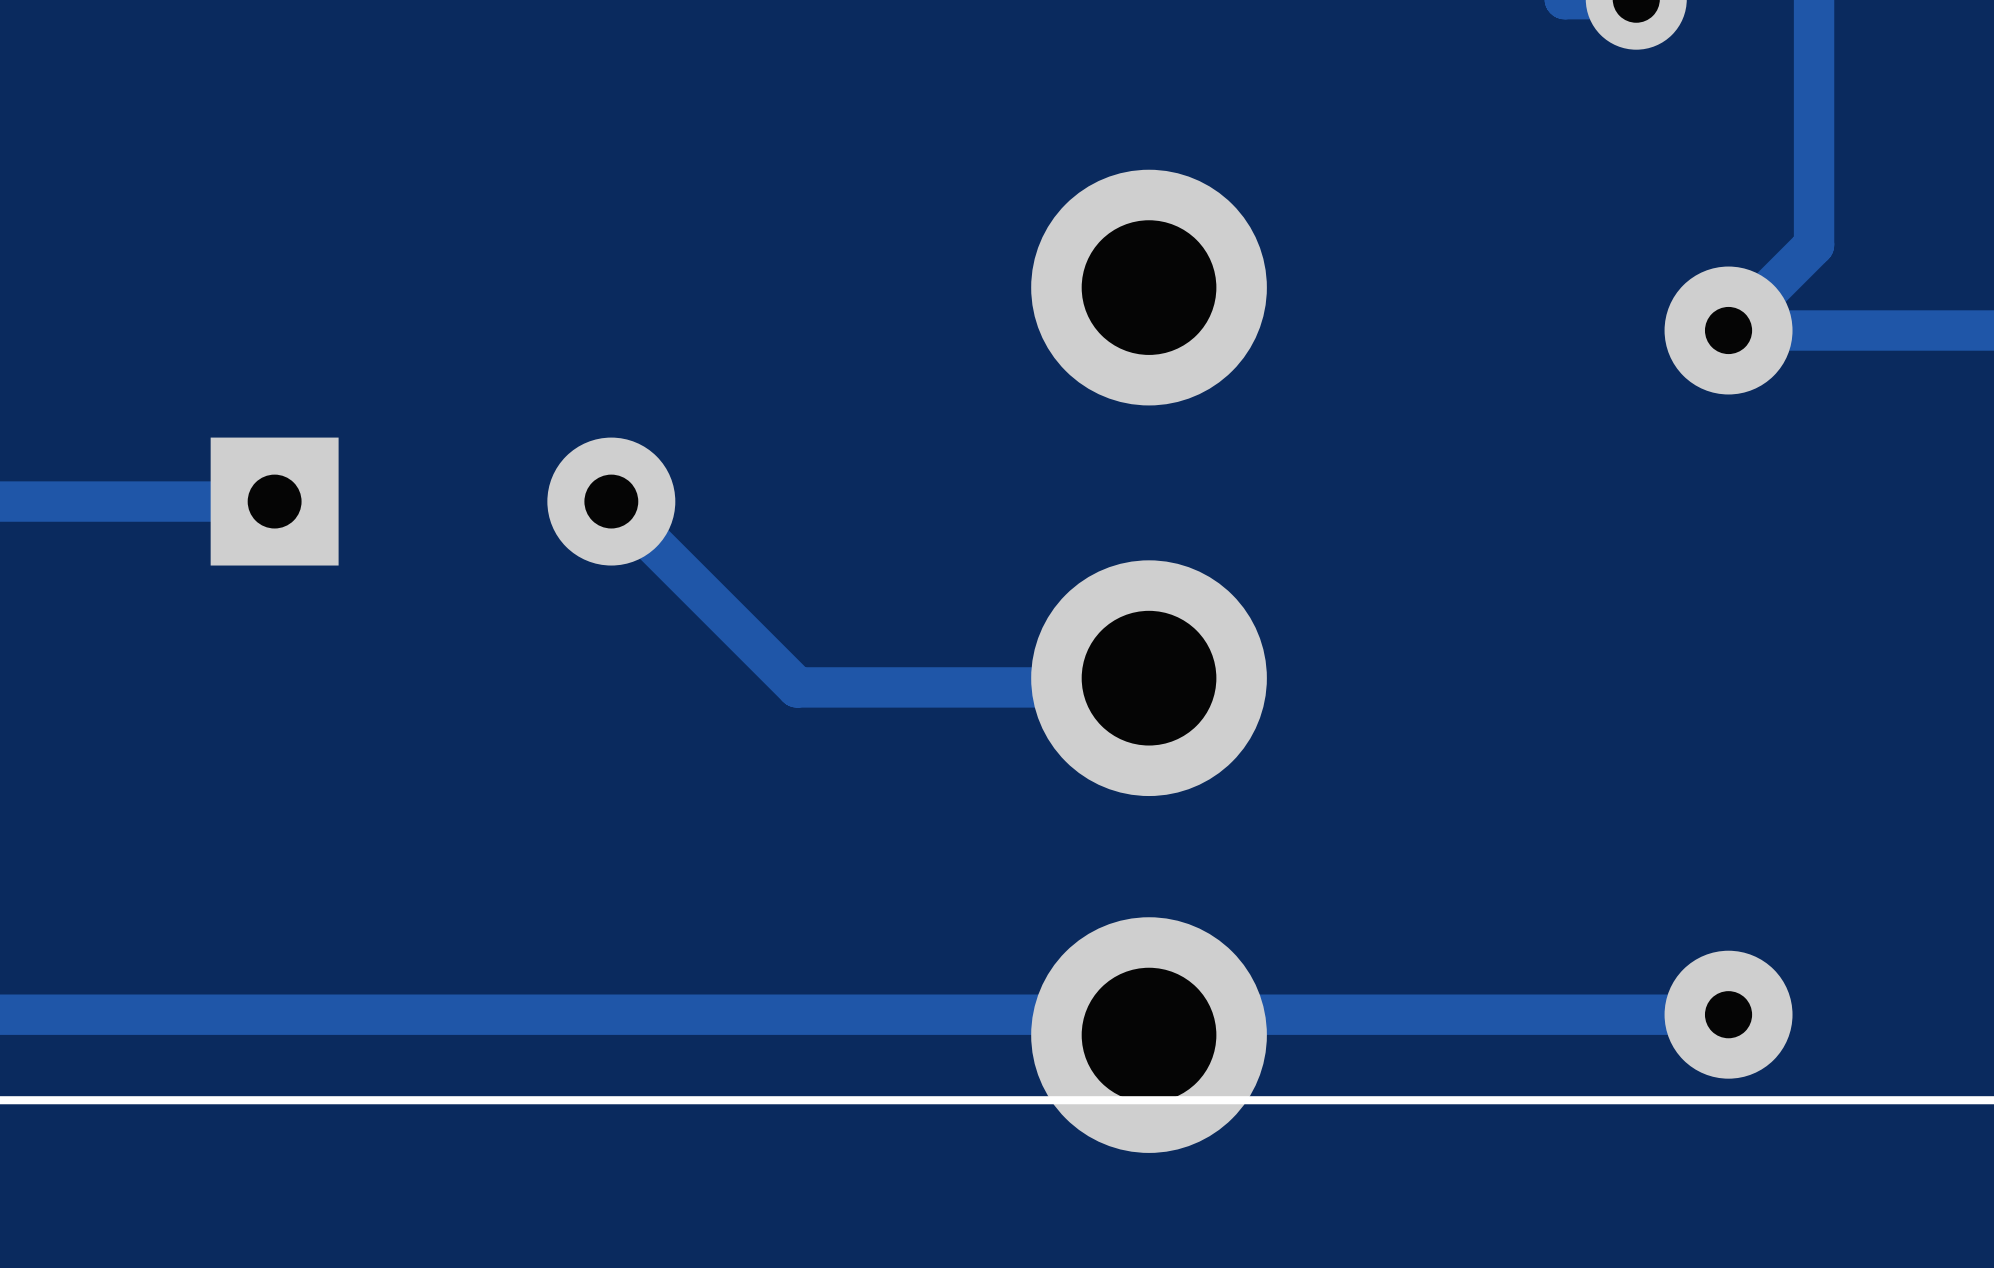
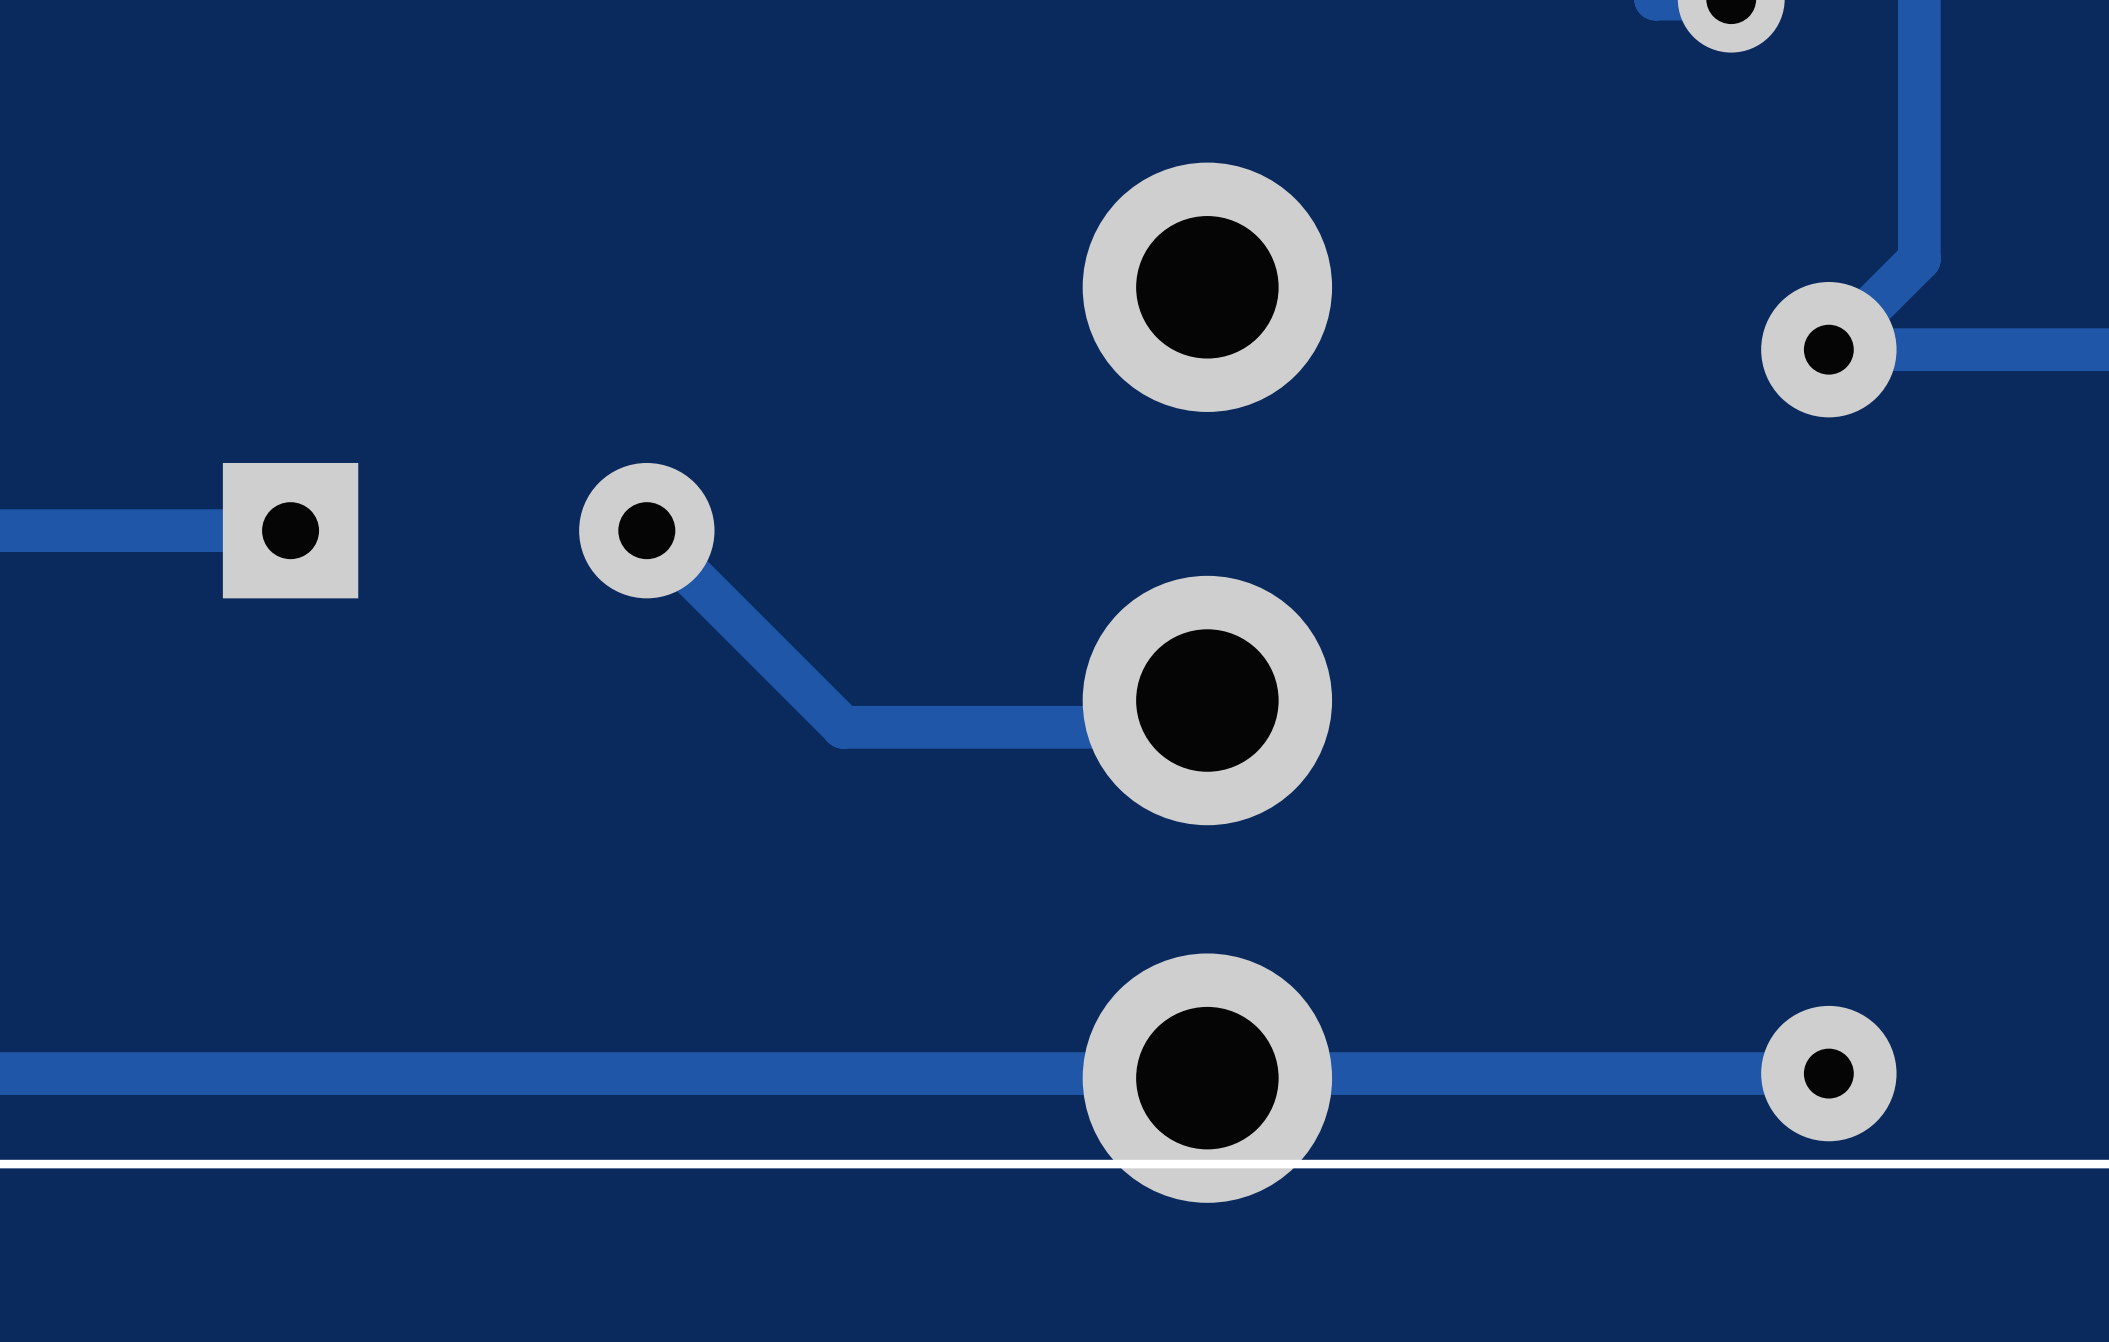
part position: (1149, 661) -> (1207, 682)

